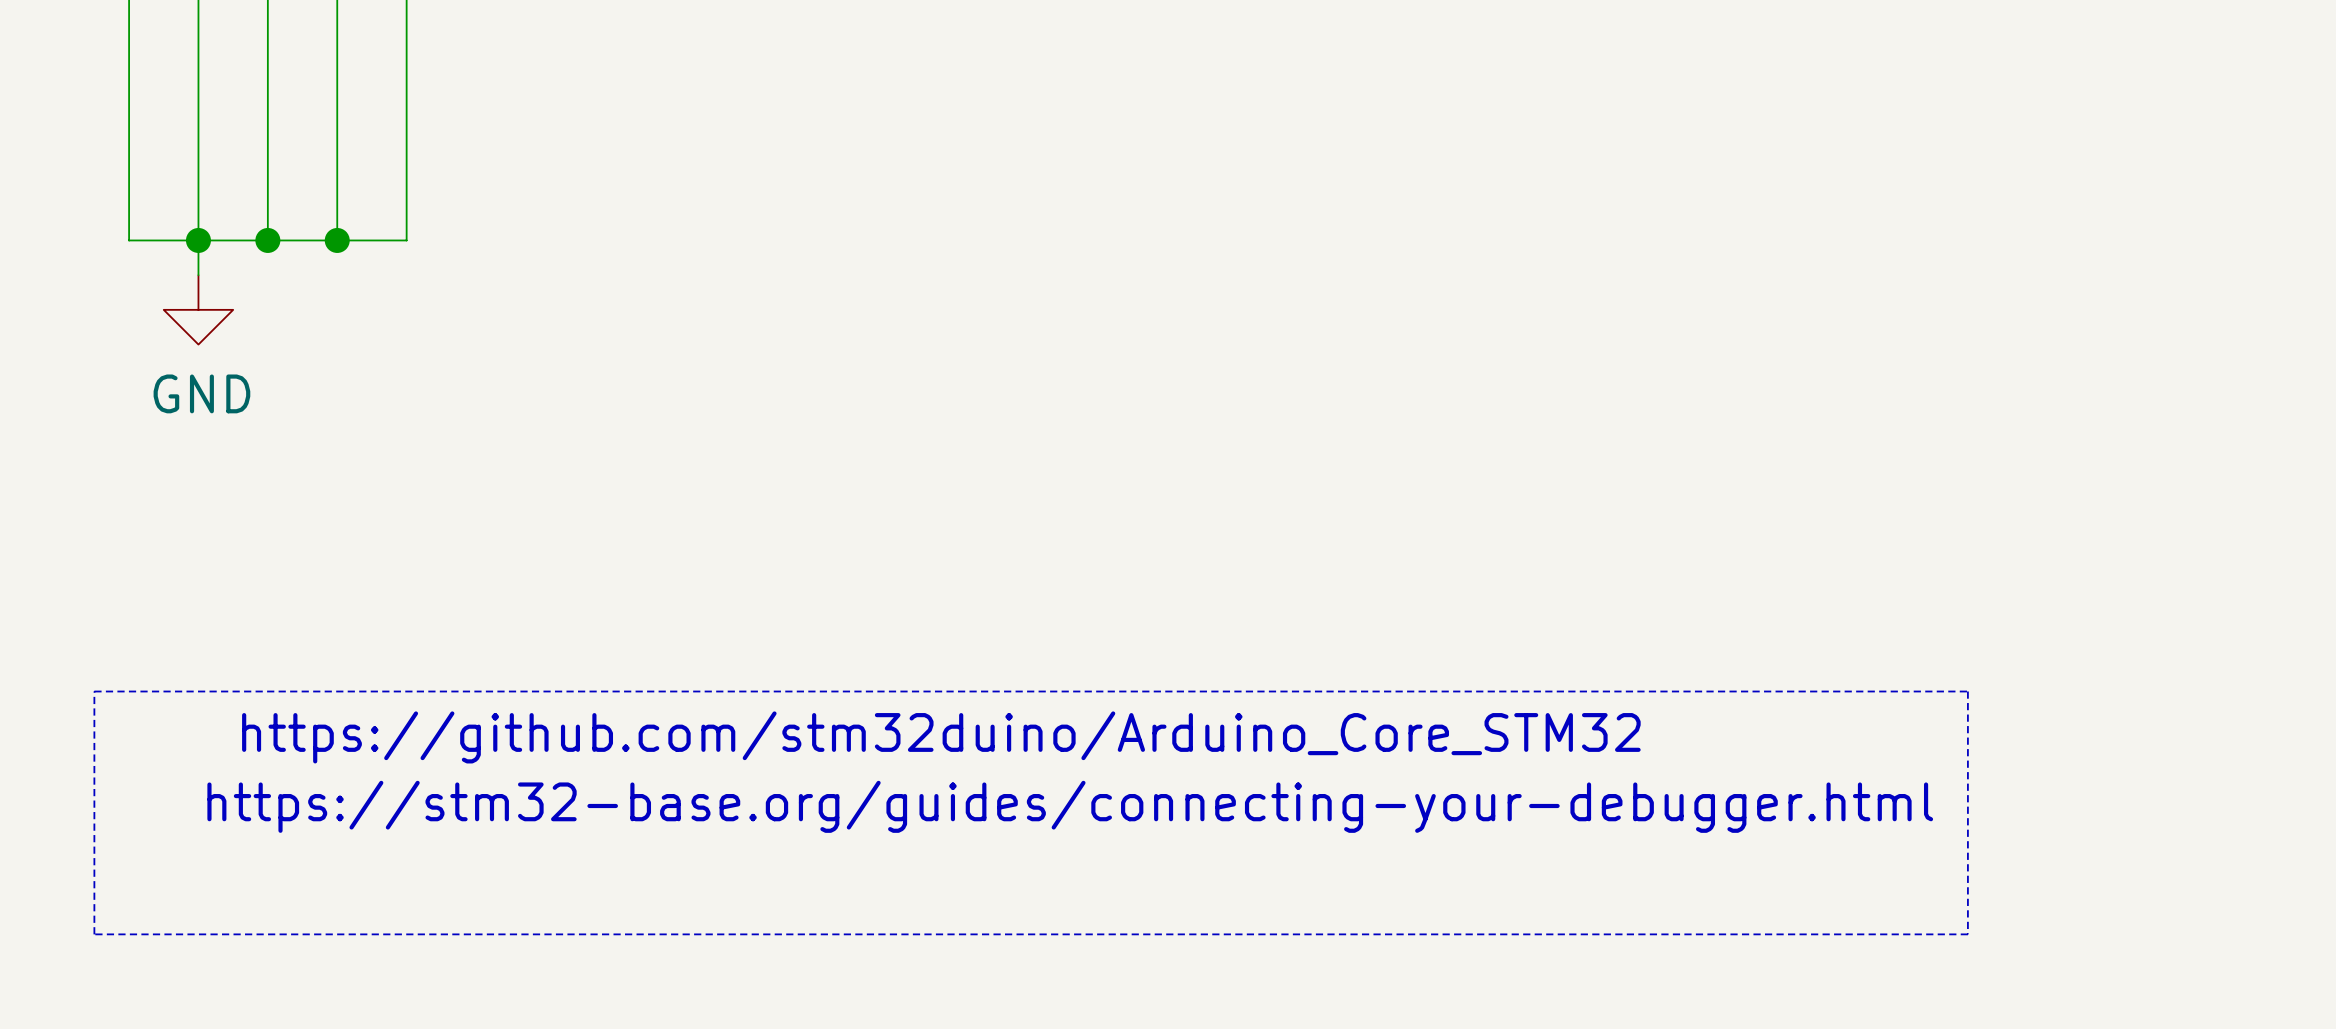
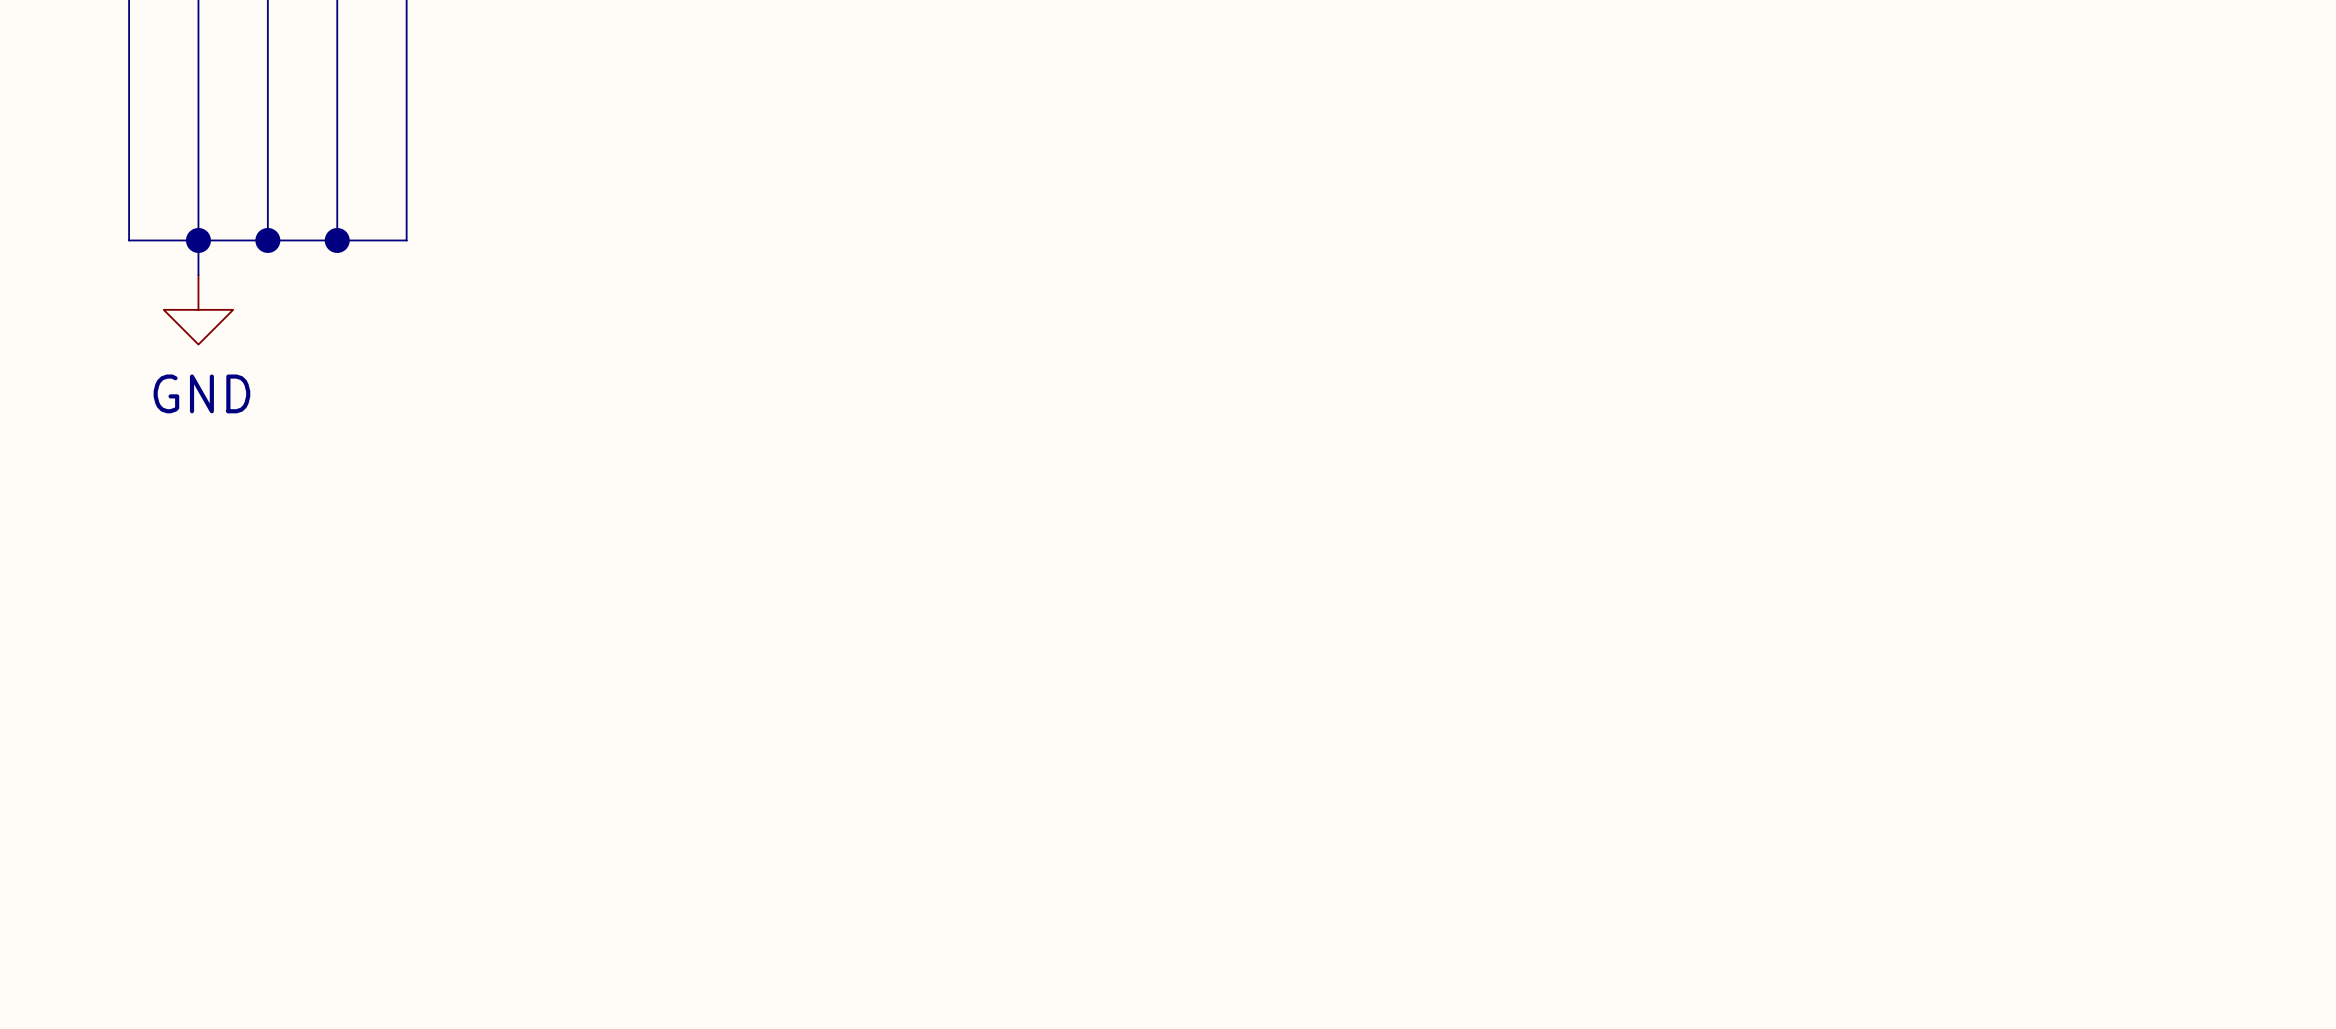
line: (94, 691) (1967, 691) (1967, 934) (94, 934) (94, 691) -> none
text: https://github.com/stm32duino/Arduino_Core_STM32 (941, 737) -> none
text: https://stm32-base.org/guides/connecting-your-debugger.html (1070, 806) -> none

